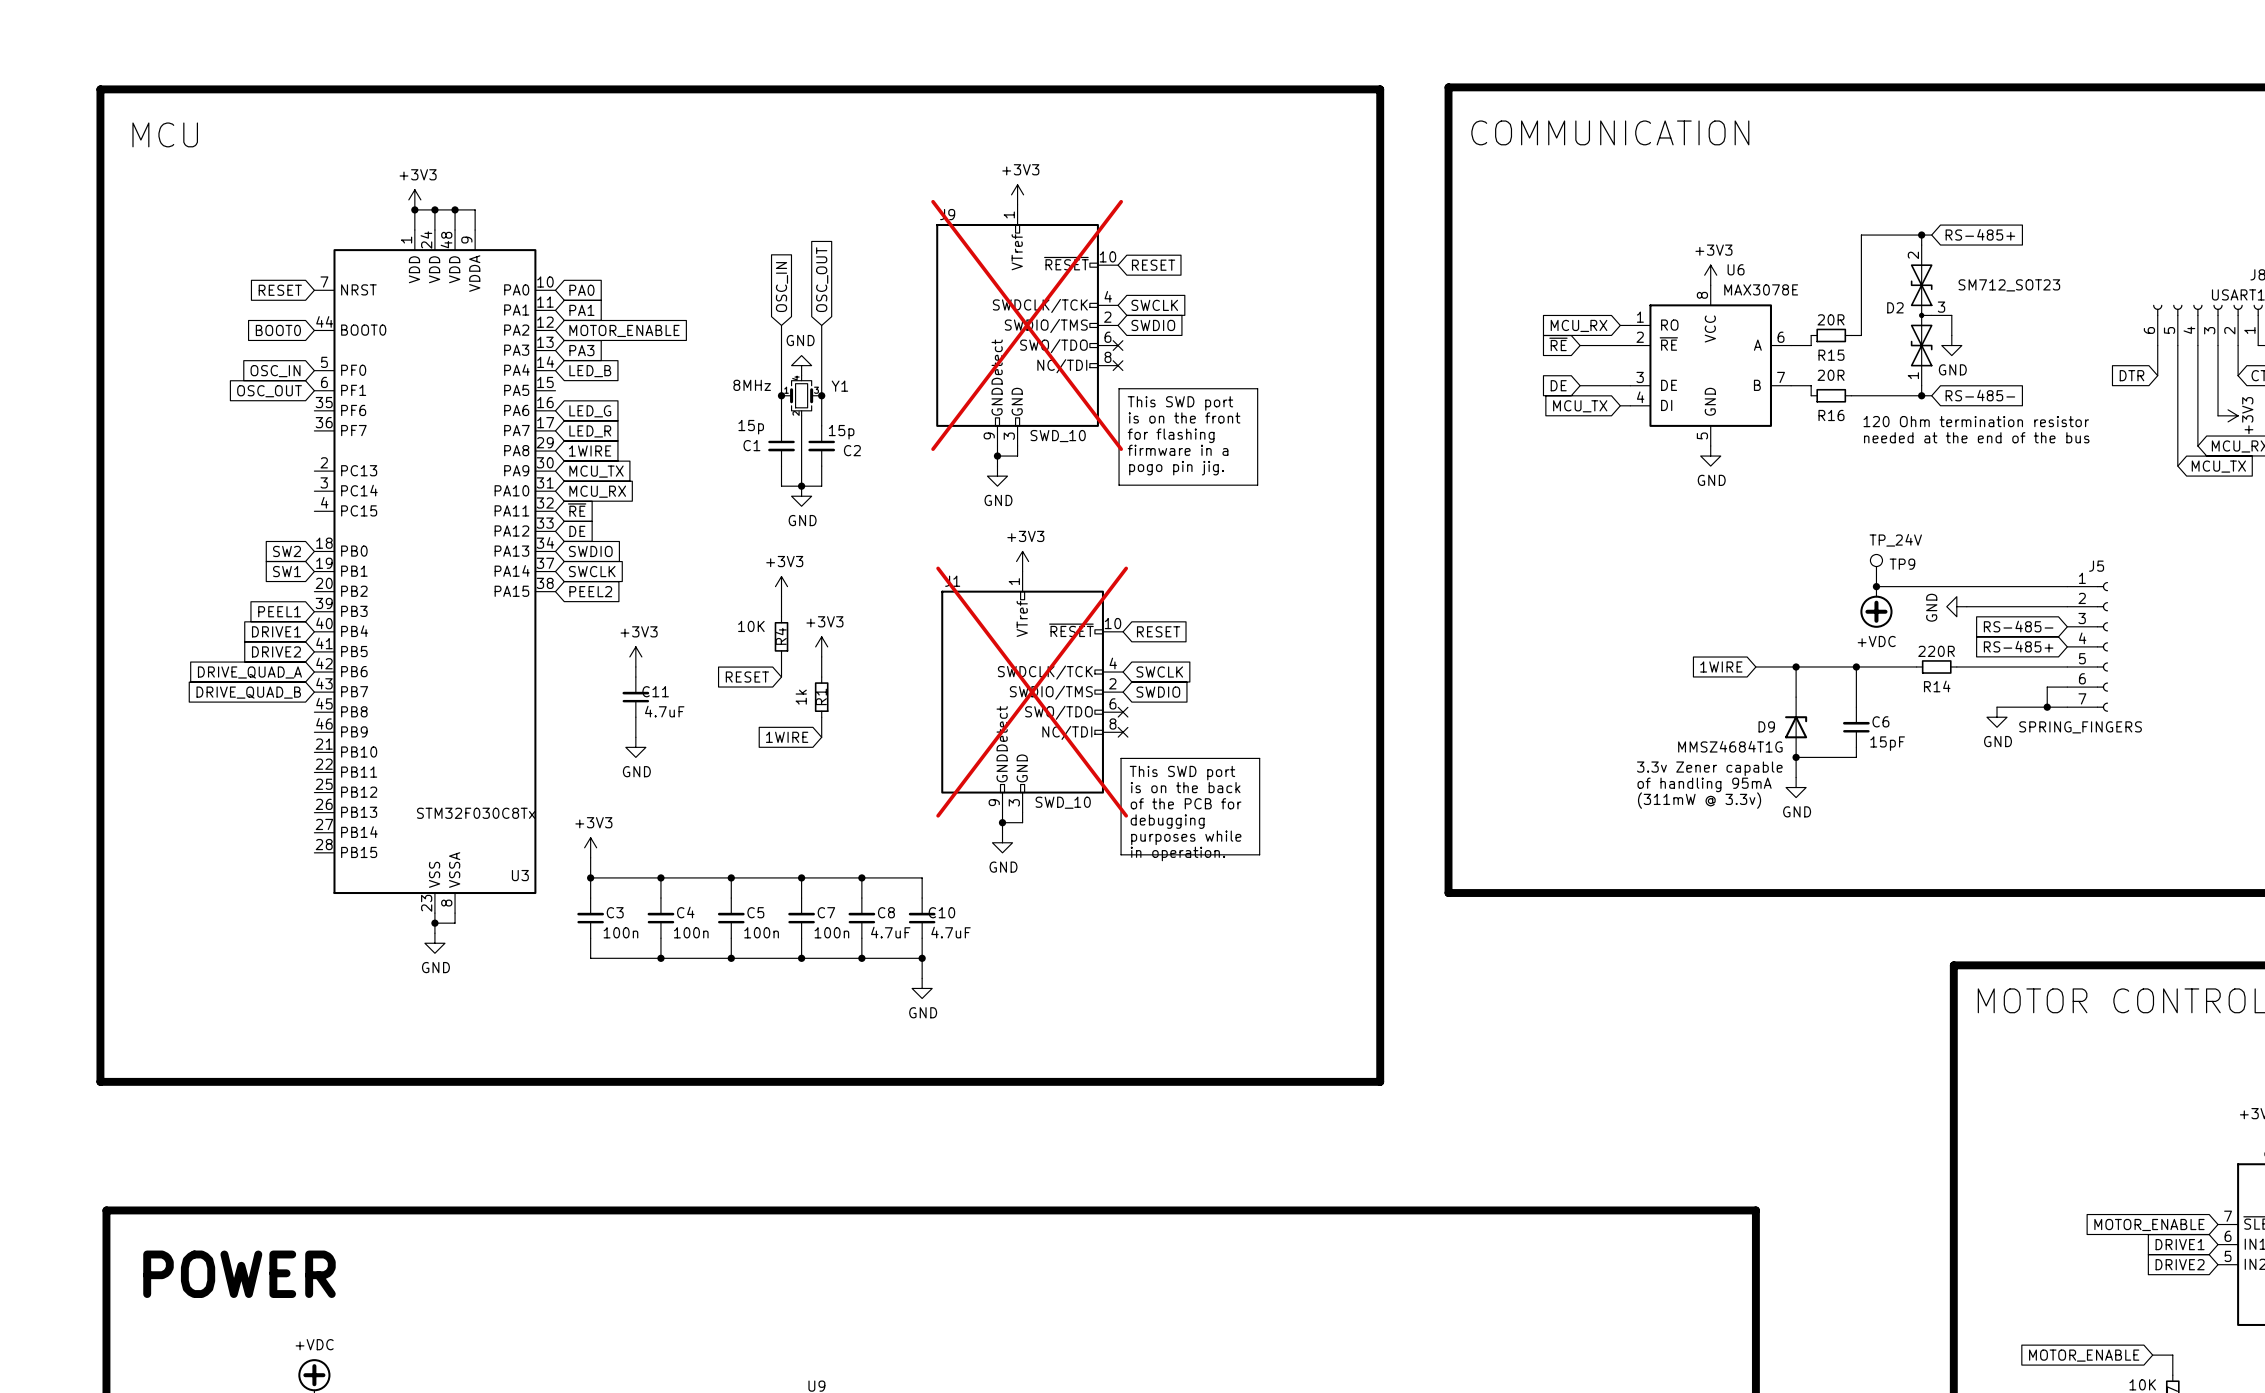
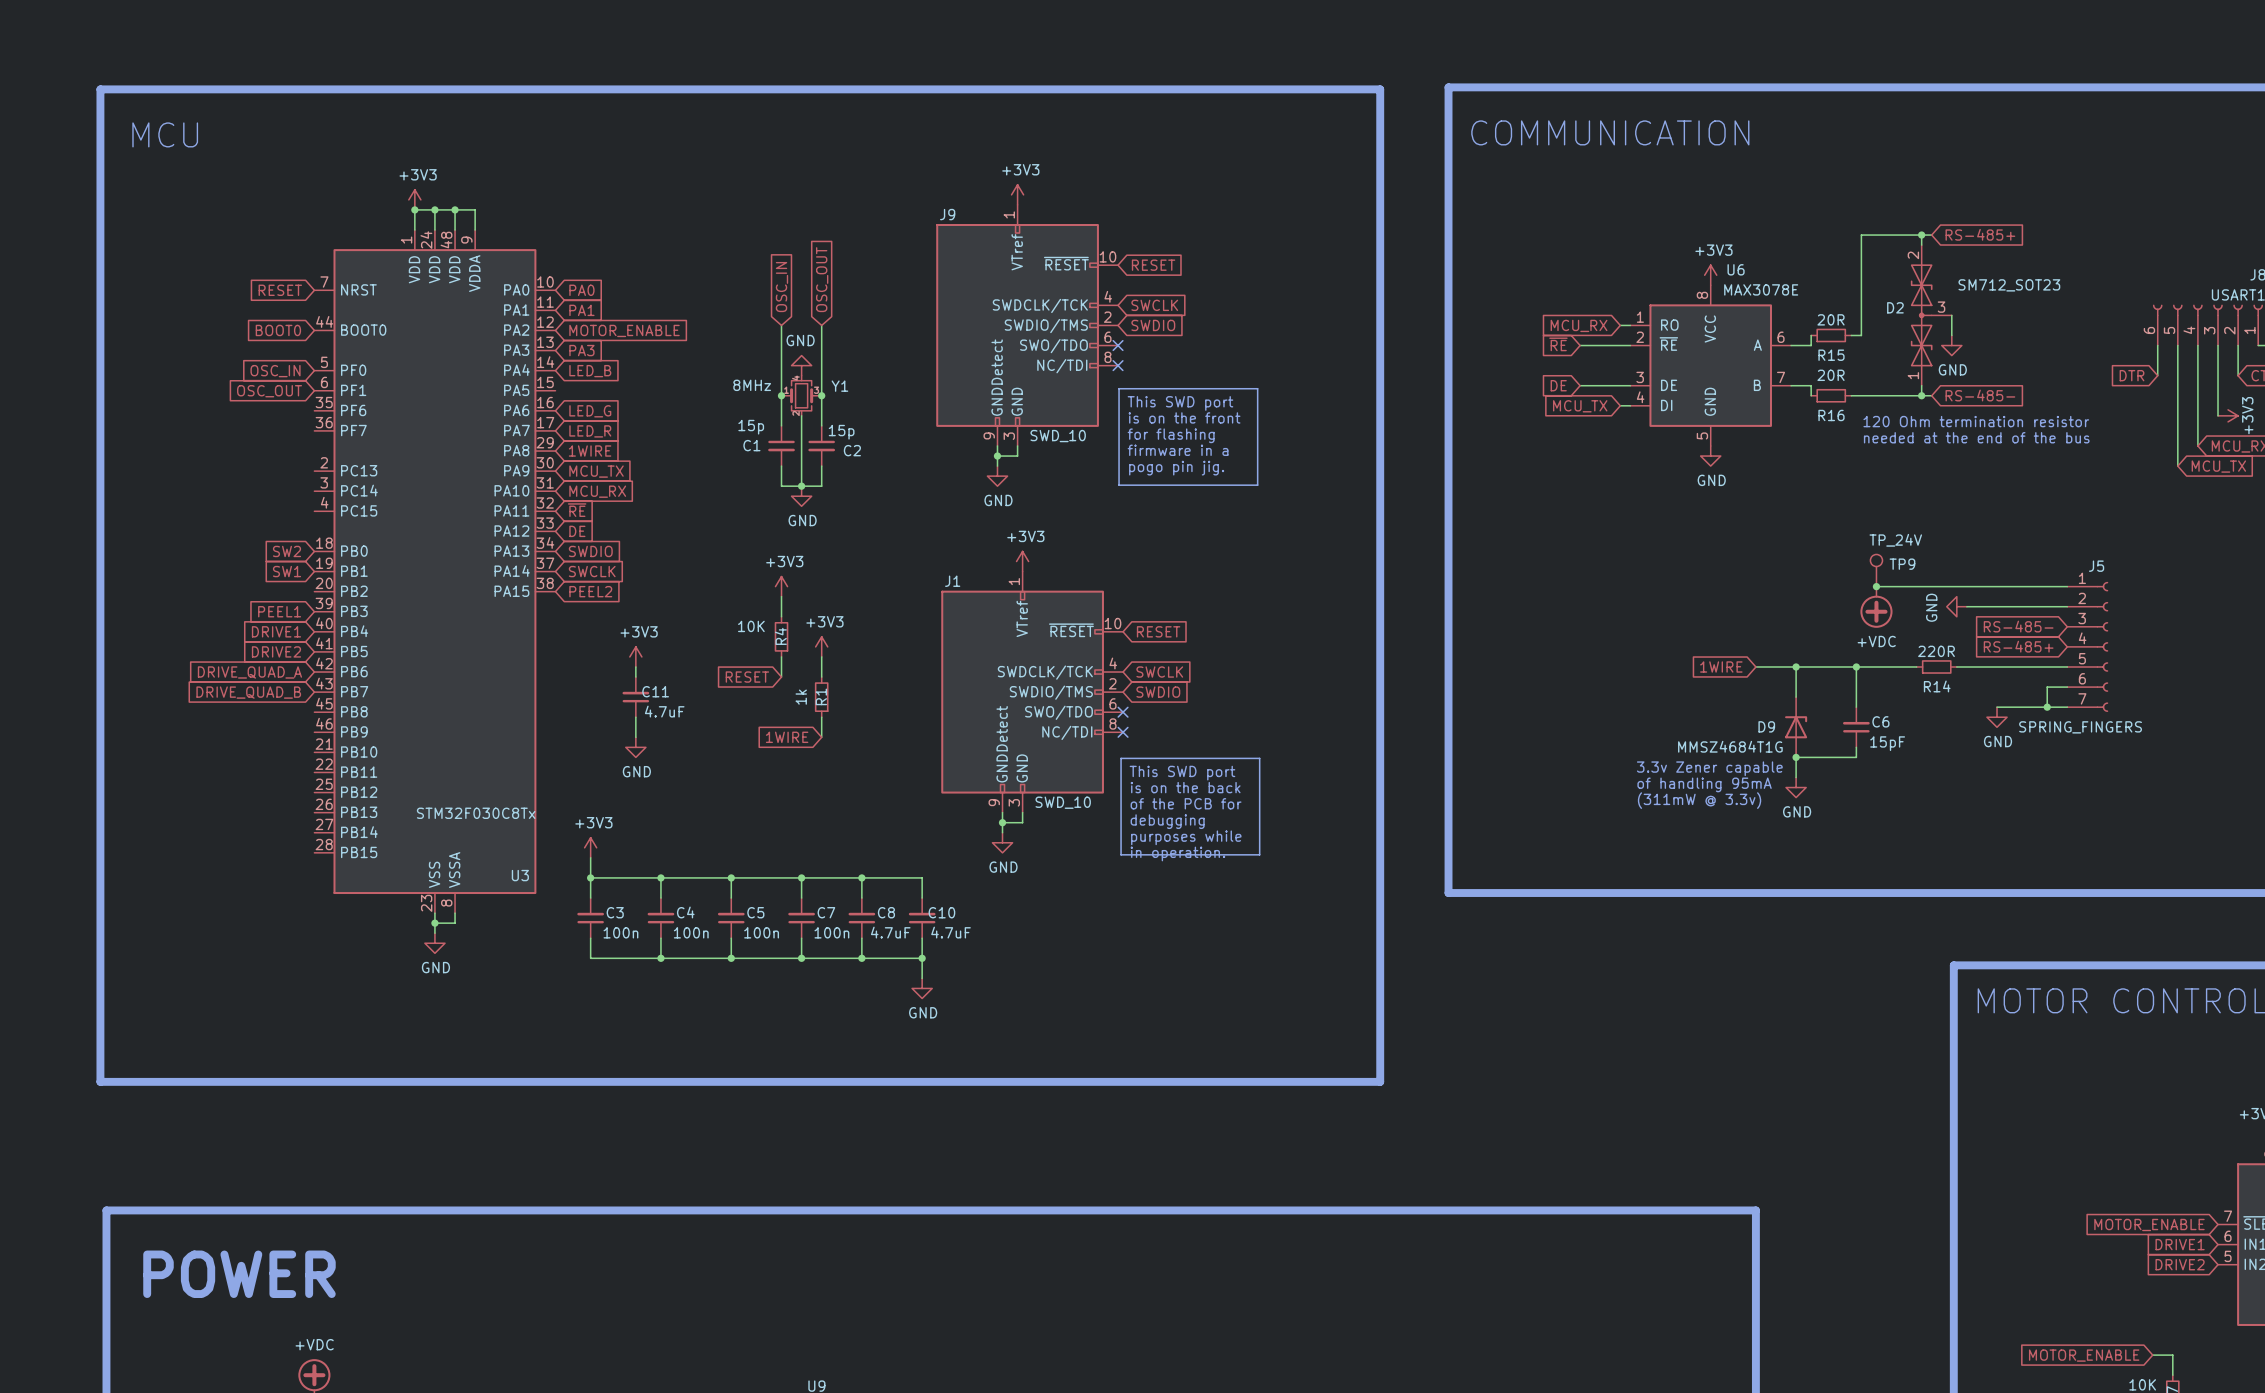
J9 do-not-place cross: (1027, 325) -> none
J1 do-not-place cross: (1032, 692) -> none

